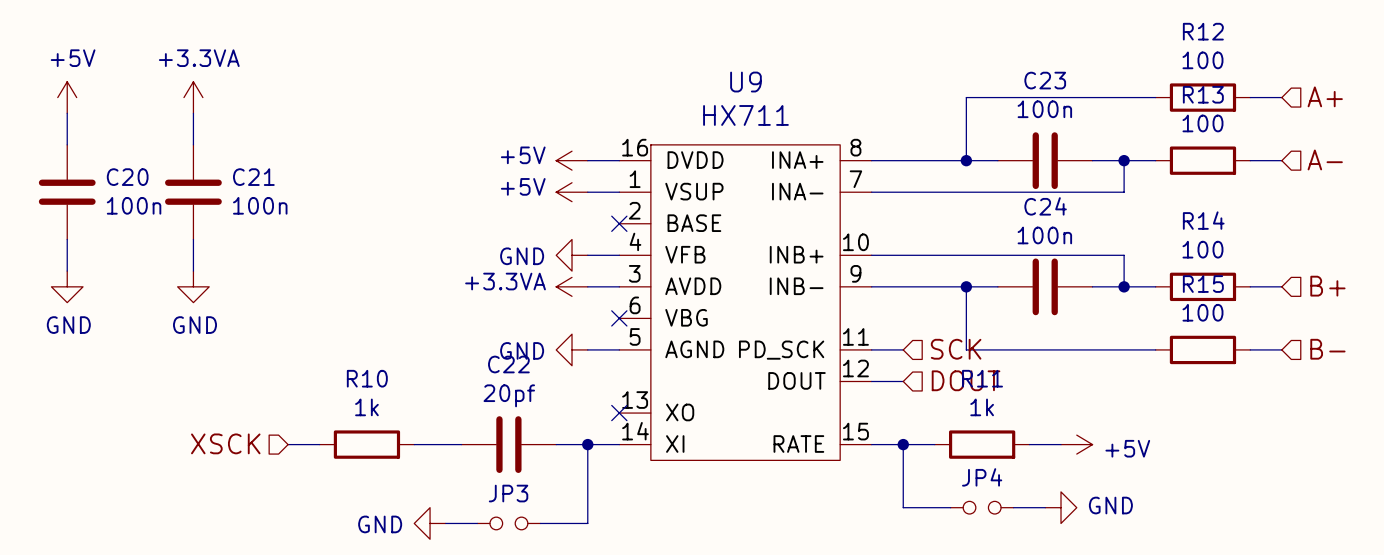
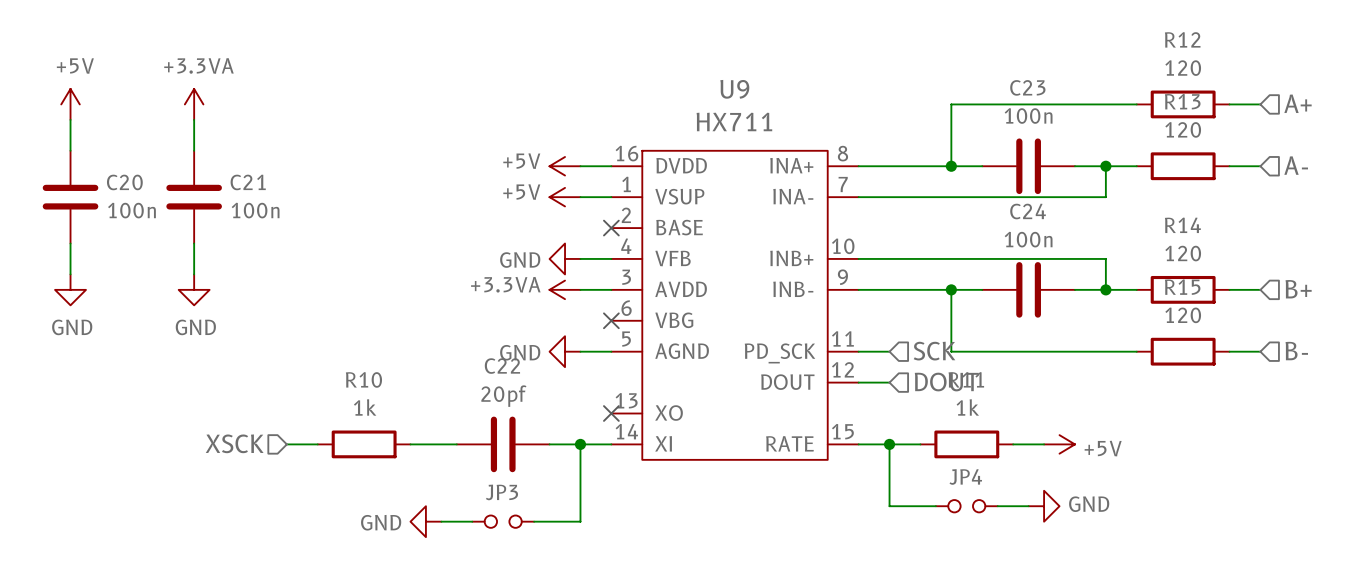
R12 value: 100 (1202, 60) -> 120 (1183, 68)
R13 value: 100 (1202, 123) -> 120 (1183, 129)
R14 value: 100 (1202, 249) -> 120 (1183, 253)
R15 value: 100 (1202, 312) -> 120 (1183, 315)

